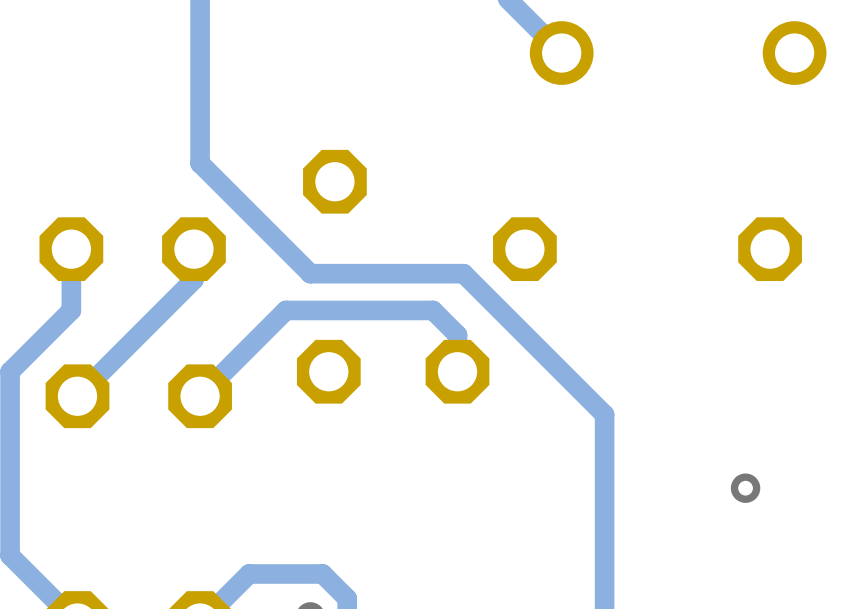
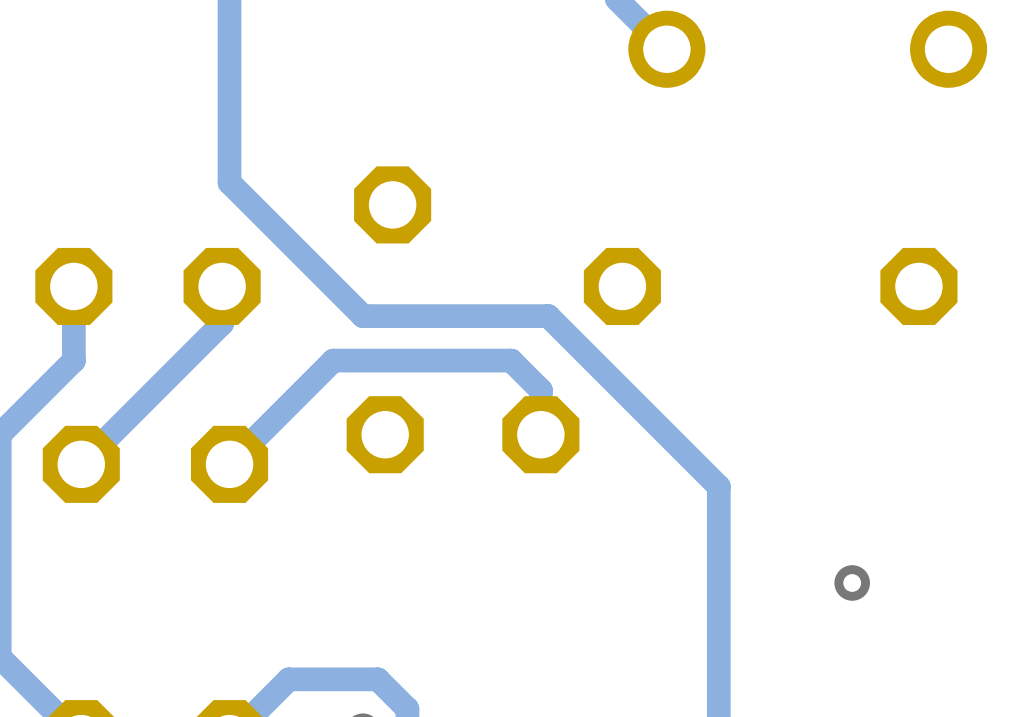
via position: (745, 488) -> (852, 582)

